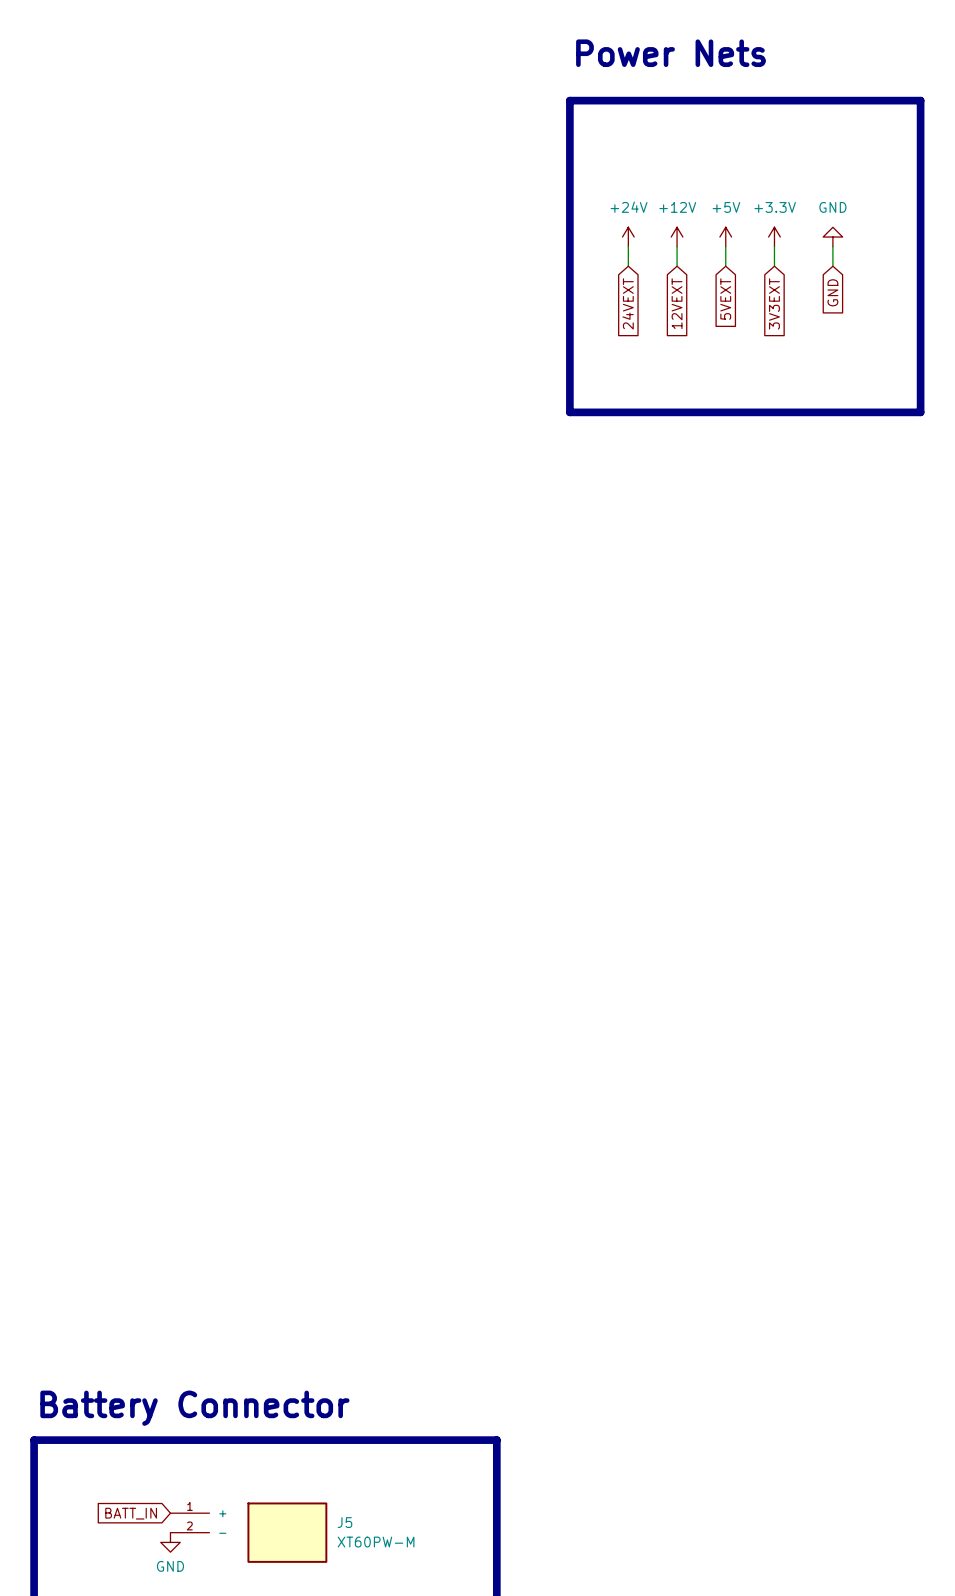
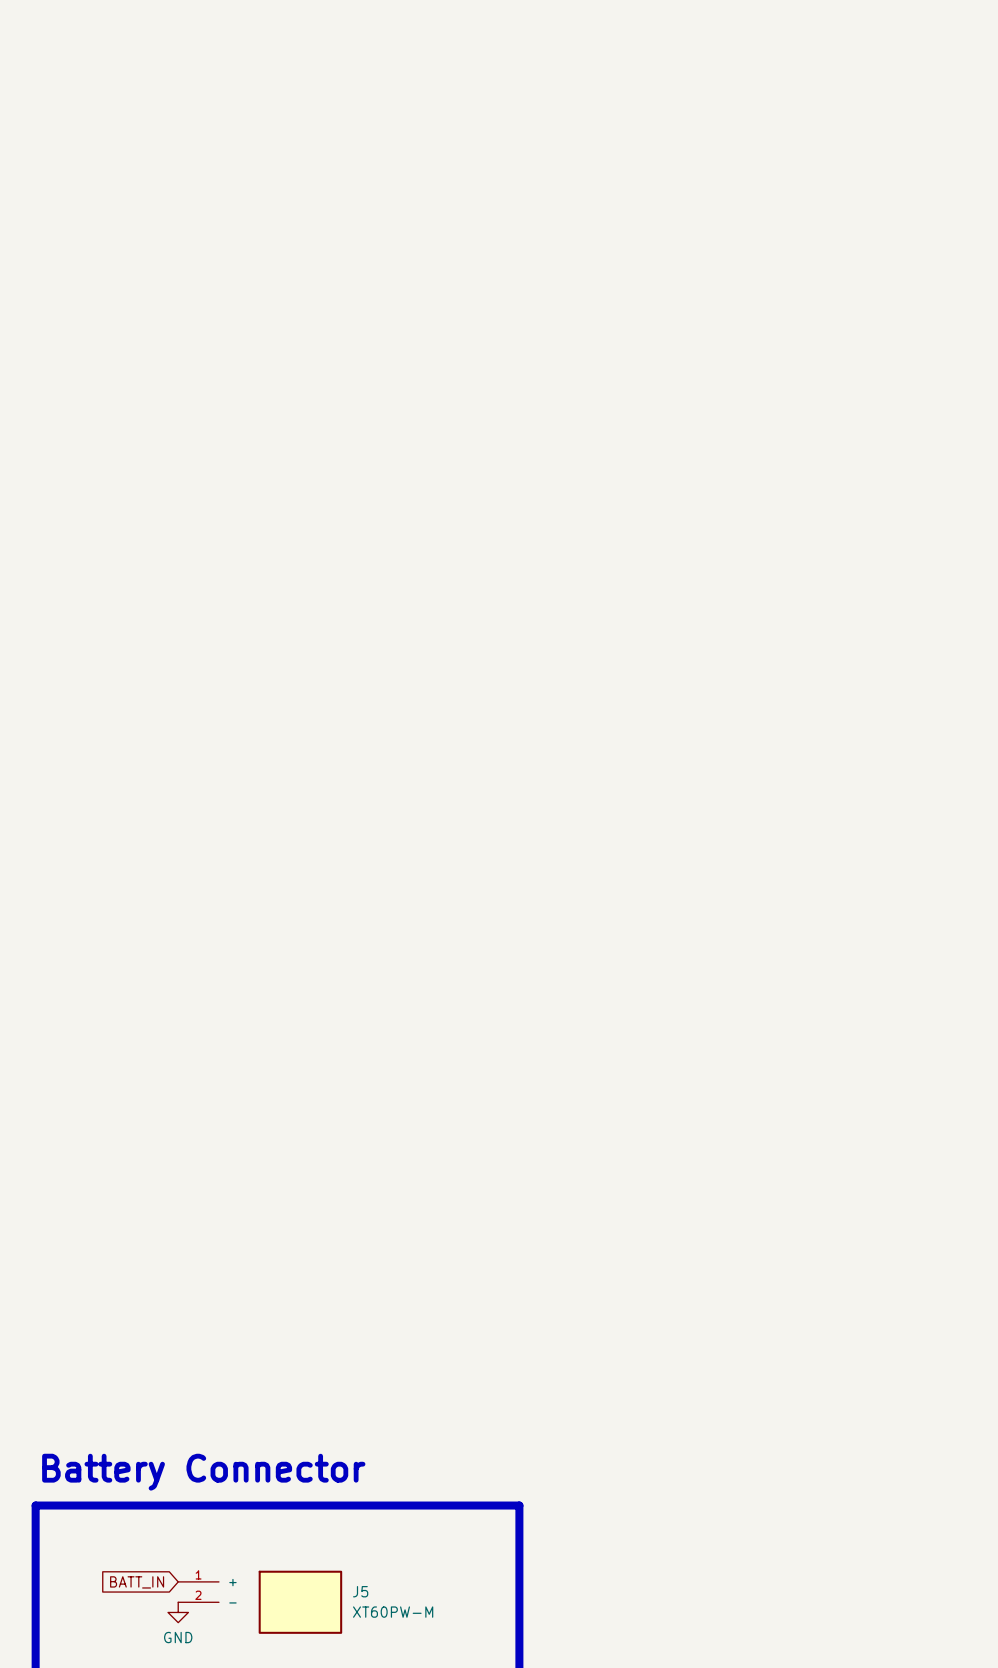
text: Power Nets (670, 53) -> none
line: (569, 100) (920, 100) (920, 412) (569, 412) (569, 100) -> none
power symbol: +24V (628, 237) -> none
power symbol: +12V (677, 237) -> none
power symbol: +5V (725, 237) -> none
power symbol: +3.3V (774, 237) -> none
power symbol: GND (832, 237) -> none
wire: (628, 246) (628, 266) -> none
wire: (677, 246) (677, 266) -> none
wire: (725, 246) (725, 266) -> none
wire: (774, 246) (774, 266) -> none
wire: (832, 246) (832, 266) -> none
global label: GND (832, 292) -> none
global label: 5VEXT (725, 299) -> none
global label: 24VEXT (628, 303) -> none
global label: 12VEXT (677, 303) -> none
global label: 3V3EXT (774, 303) -> none

